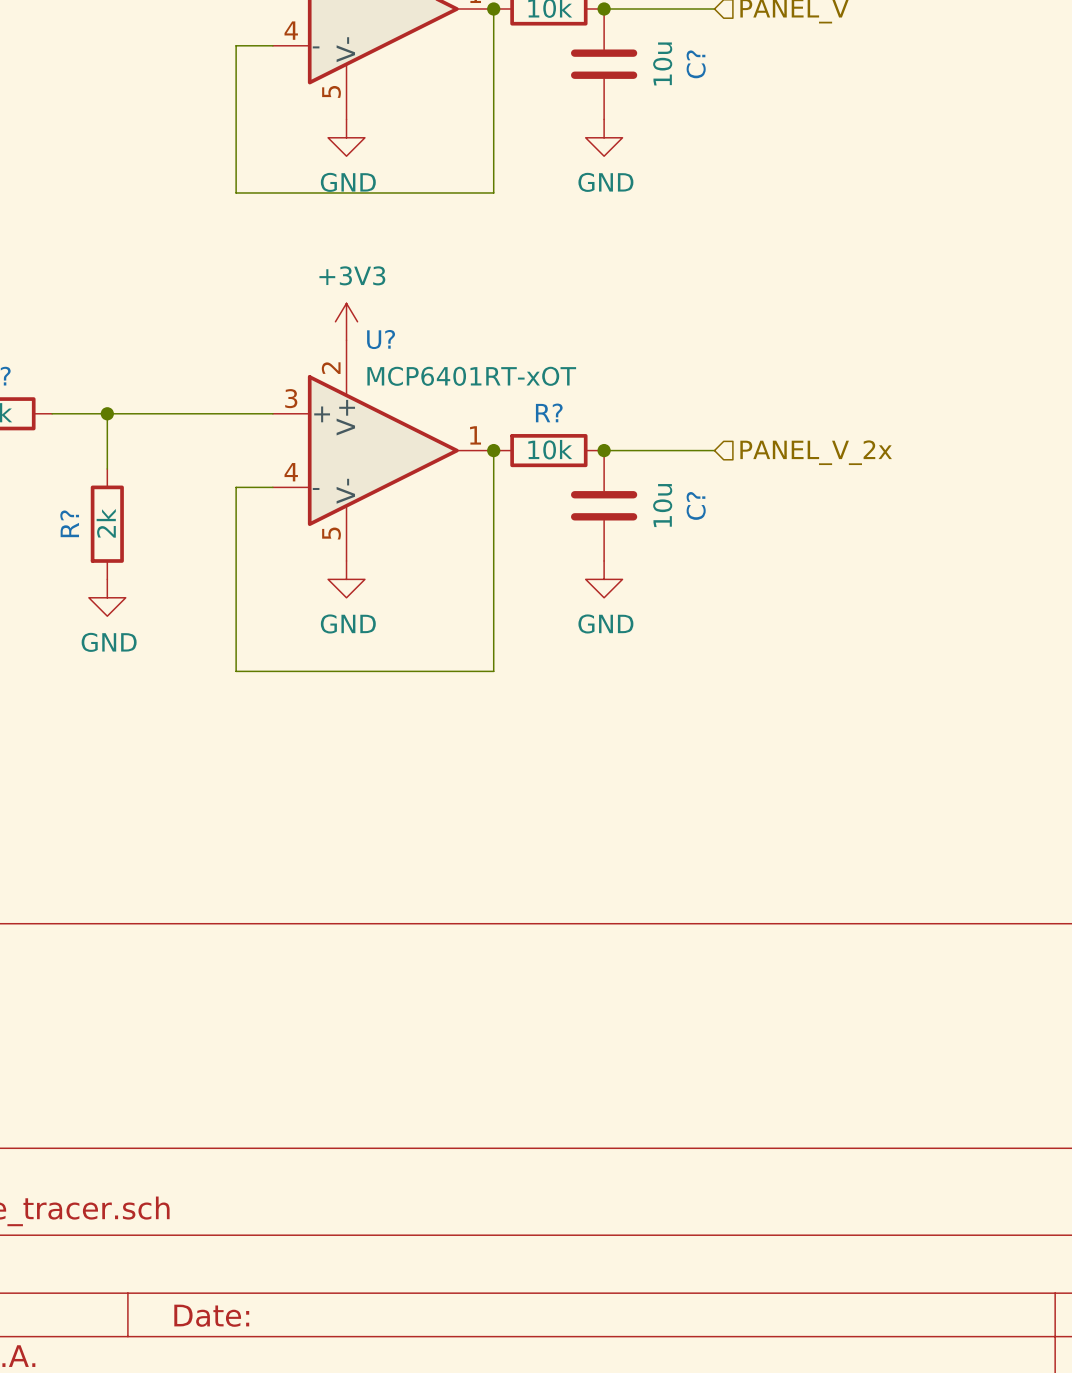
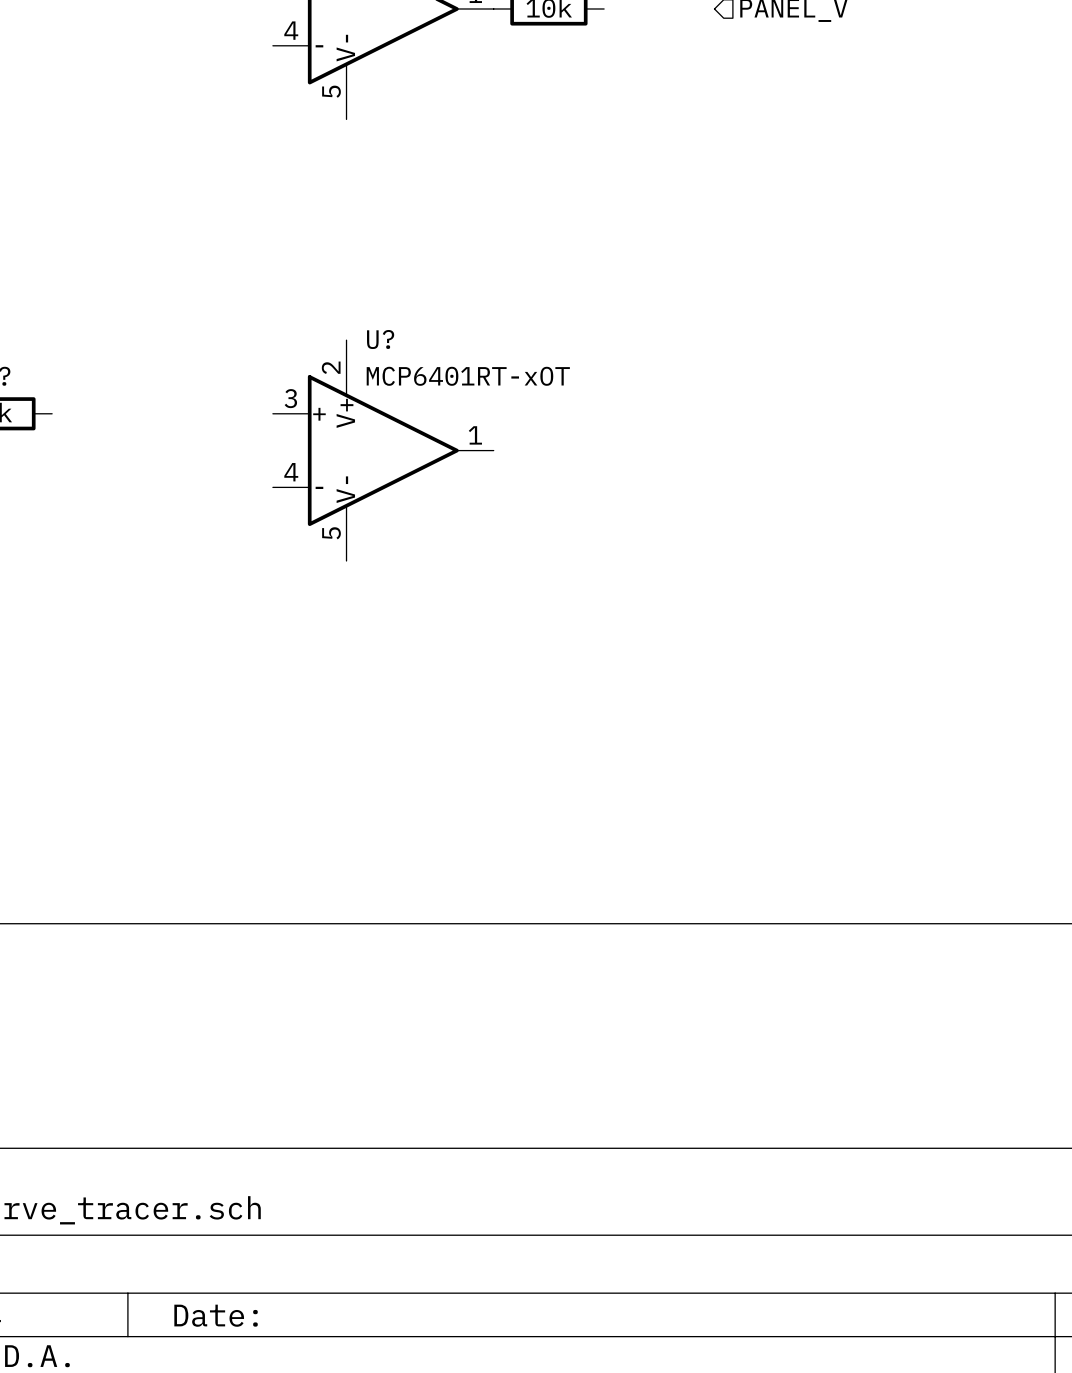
wire: (493, 8) (493, 192) (236, 192) (236, 45) (272, 45) -> none
junction: (493, 8) -> none
wire: (604, 8) (714, 8) -> none
junction: (604, 8) -> none
C?: 10u (604, 64) -> none
power symbol: GND (346, 137) -> none
power symbol: GND (604, 137) -> none
power symbol: +3V3 (346, 321) -> none
wire: (52, 413) (272, 413) -> none
wire: (107, 413) (107, 468) -> none
junction: (107, 413) -> none
wire: (493, 450) (493, 671) (236, 671) (236, 487) (272, 487) -> none
junction: (493, 450) -> none
R?: 10k (548, 450) -> none
wire: (604, 450) (714, 450) -> none
junction: (604, 450) -> none
hierarchical label: PANEL_V_2x (816, 452) -> none
C?: 10u (604, 505) -> none
R?: 2k (107, 524) -> none
power symbol: GND (346, 579) -> none
power symbol: GND (604, 579) -> none
power symbol: GND (107, 597) -> none

